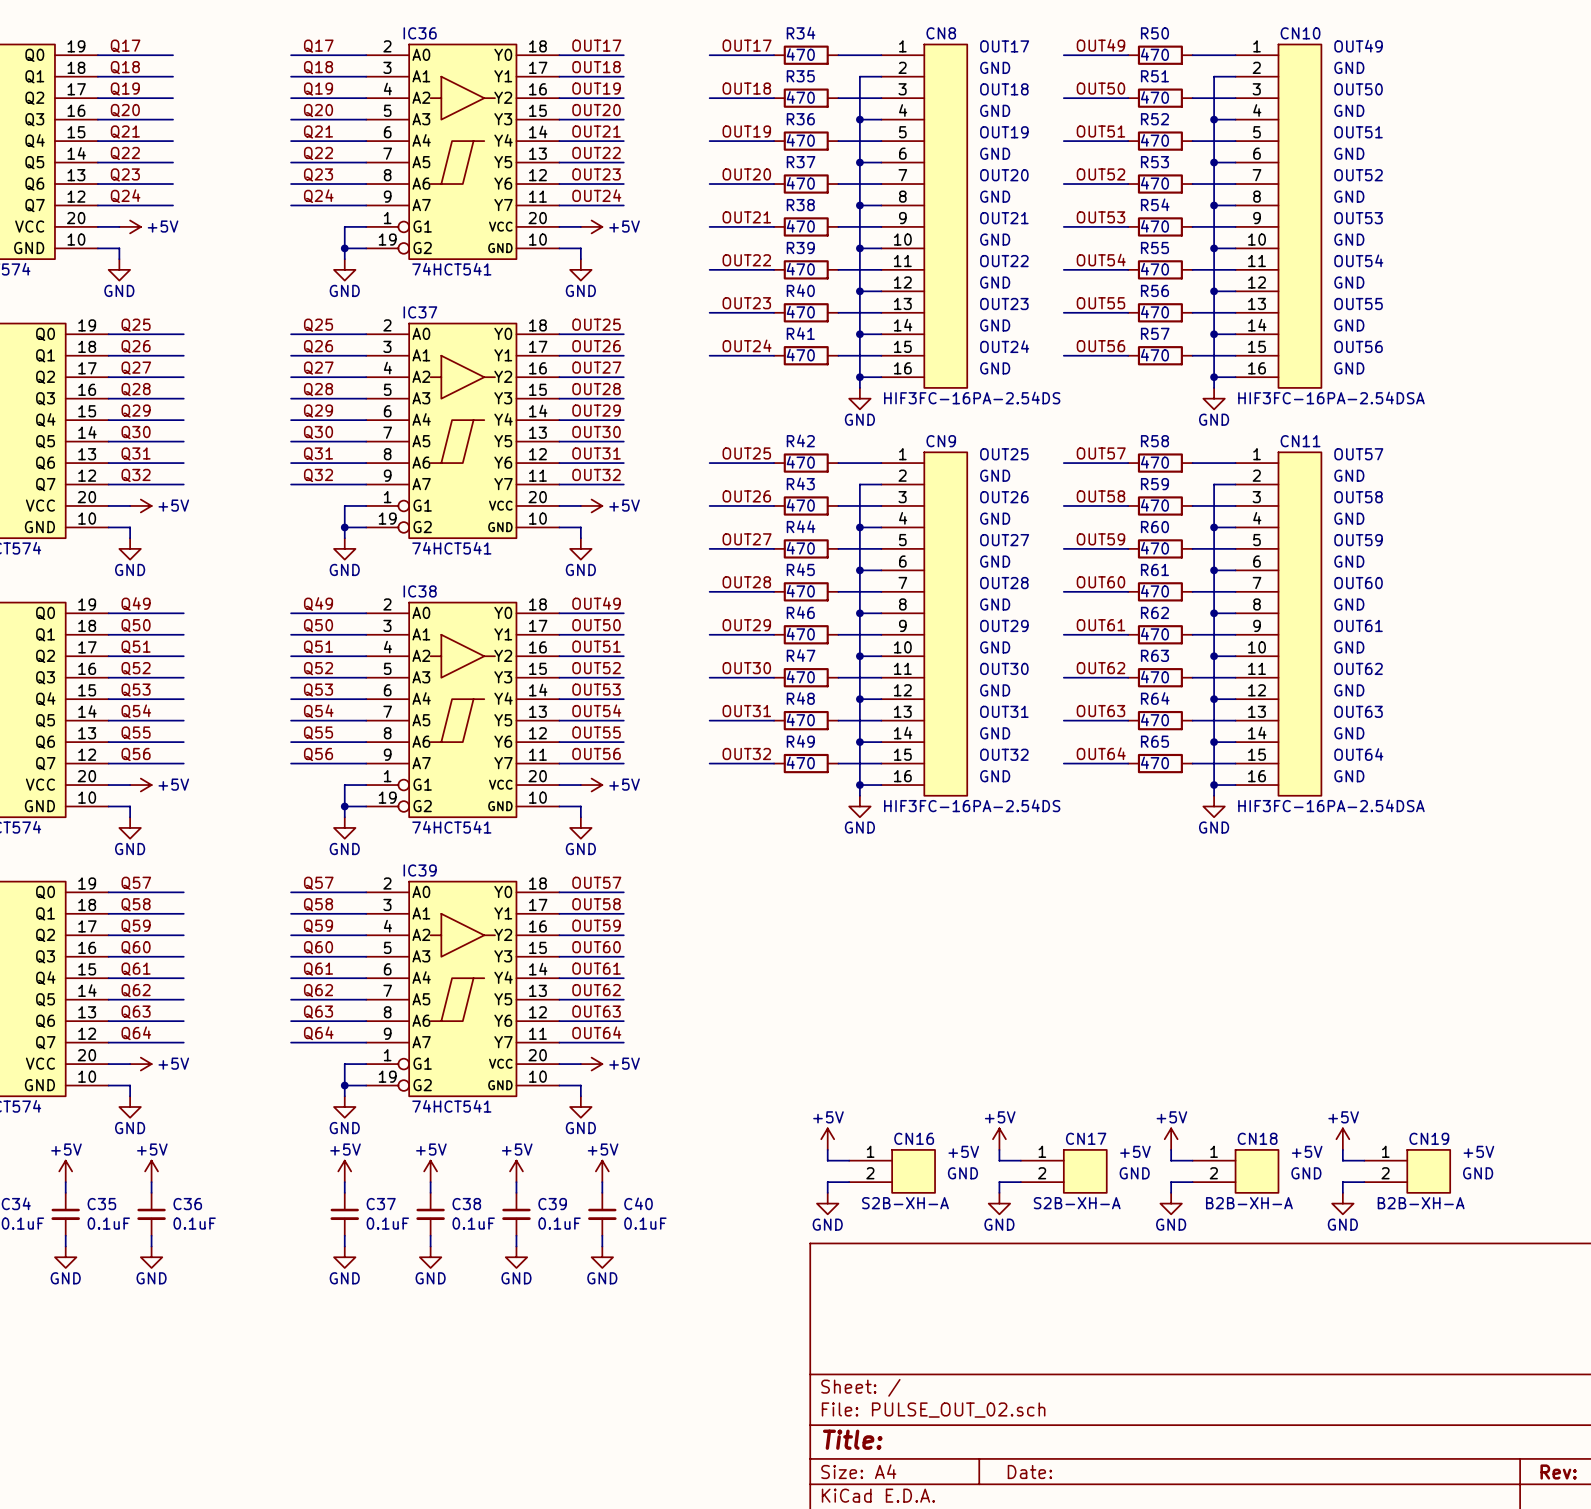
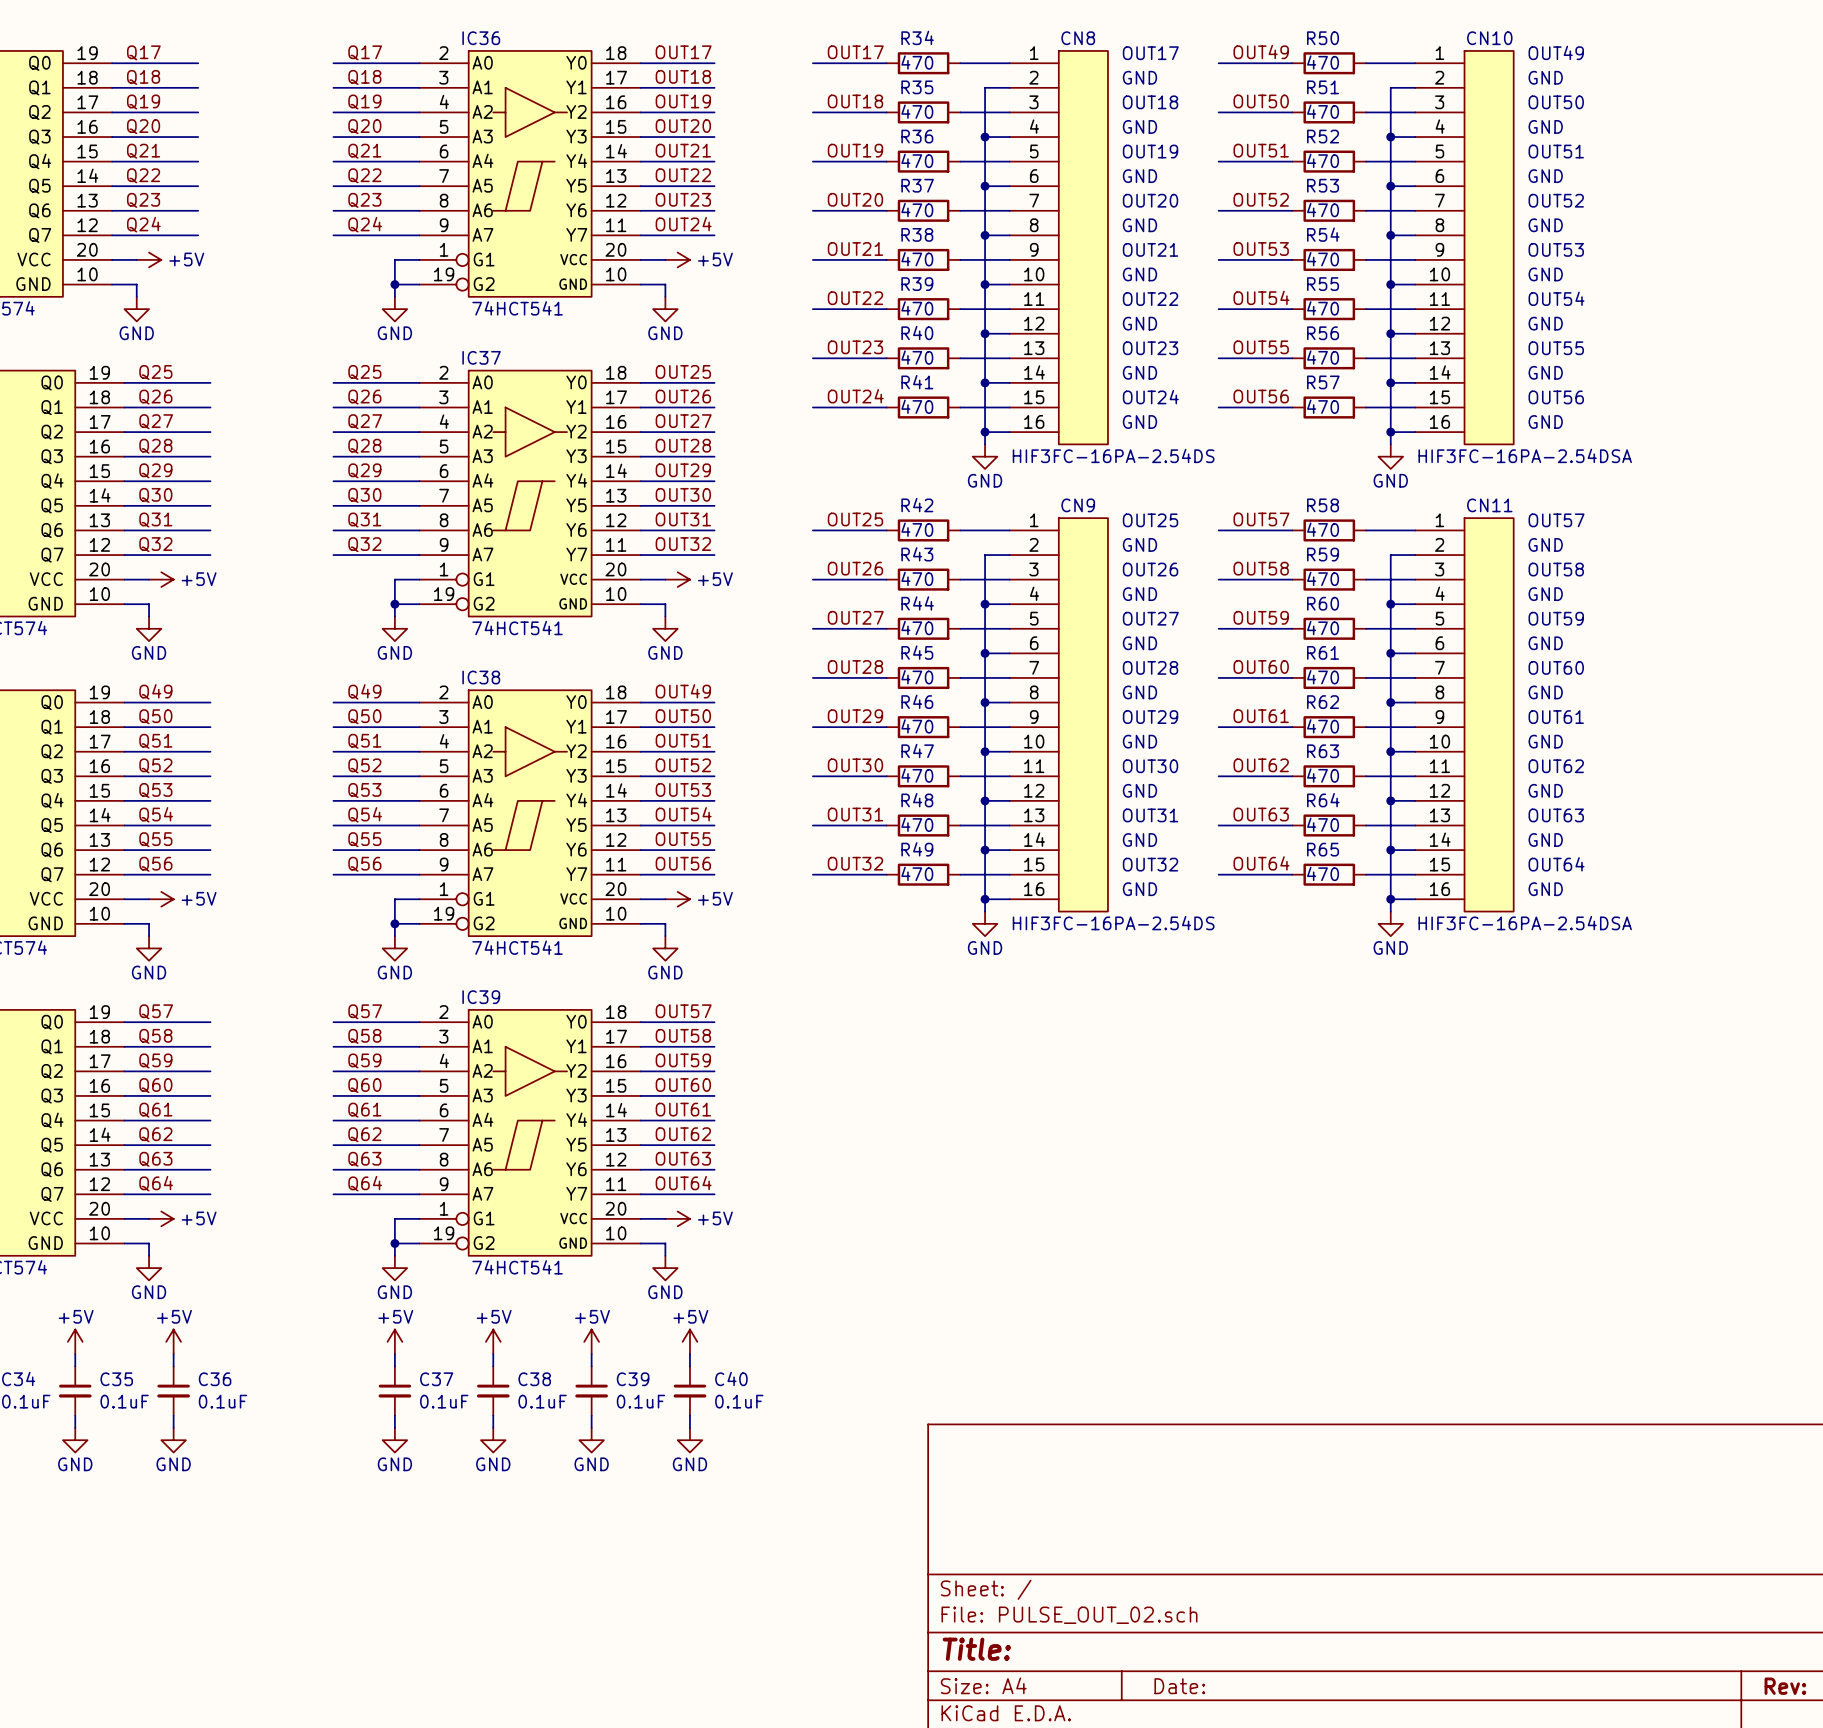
power symbol: +5V (827, 1139) -> none
power symbol: +5V (999, 1139) -> none
power symbol: +5V (1171, 1139) -> none
power symbol: +5V (1342, 1139) -> none
wire: (827, 1149) (827, 1160) (849, 1160) -> none
wire: (999, 1149) (999, 1160) (1020, 1160) -> none
wire: (1171, 1149) (1171, 1160) (1192, 1160) -> none
wire: (1342, 1149) (1342, 1160) (1364, 1160) -> none
text: +5V (963, 1151) -> none
text: +5V (1135, 1151) -> none
text: +5V (1307, 1151) -> none
text: +5V (1478, 1151) -> none
CN16: S2B-XH-A (892, 1171) -> none
CN17: S2B-XH-A (1063, 1171) -> none
CN18: B2B-XH-A (1235, 1171) -> none
CN19: B2B-XH-A (1407, 1171) -> none
text: GND (962, 1173) -> none
text: GND (1134, 1173) -> none
text: GND (1306, 1173) -> none
text: GND (1478, 1173) -> none
wire: (849, 1182) (827, 1182) (827, 1192) -> none
wire: (1020, 1182) (999, 1182) (999, 1192) -> none
wire: (1192, 1182) (1171, 1182) (1171, 1192) -> none
wire: (1364, 1182) (1342, 1182) (1342, 1192) -> none
power symbol: GND (827, 1203) -> none
power symbol: GND (999, 1203) -> none
power symbol: GND (1171, 1203) -> none
power symbol: GND (1342, 1203) -> none

